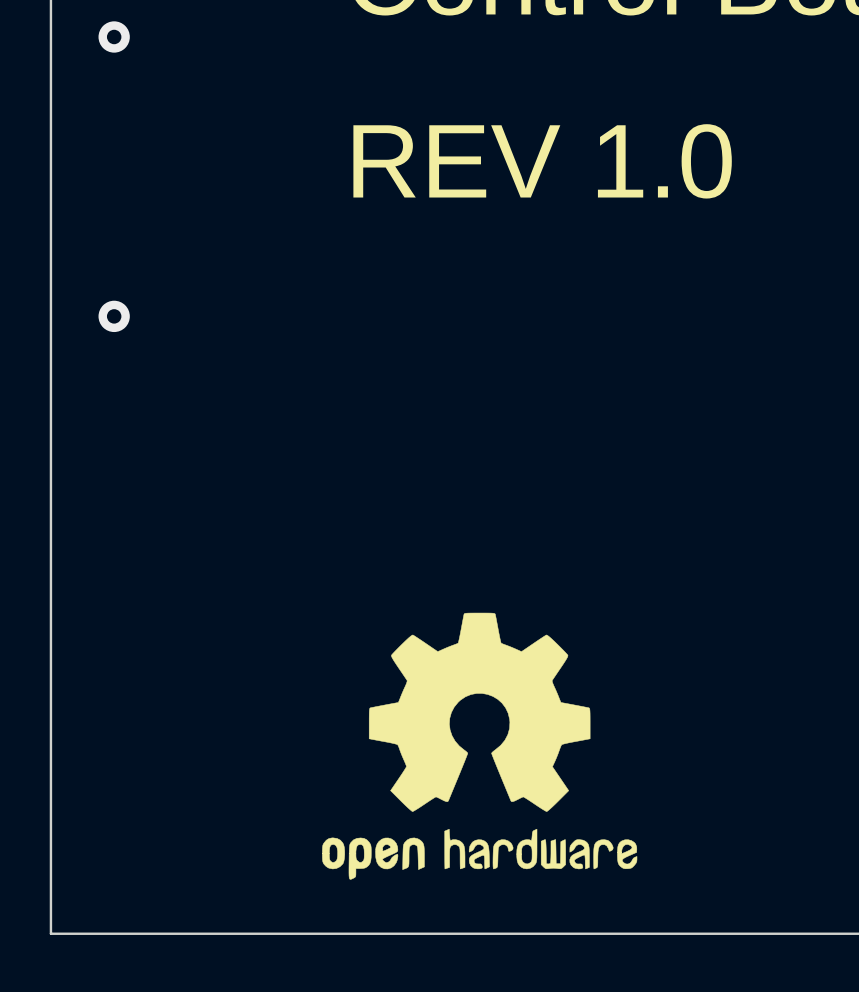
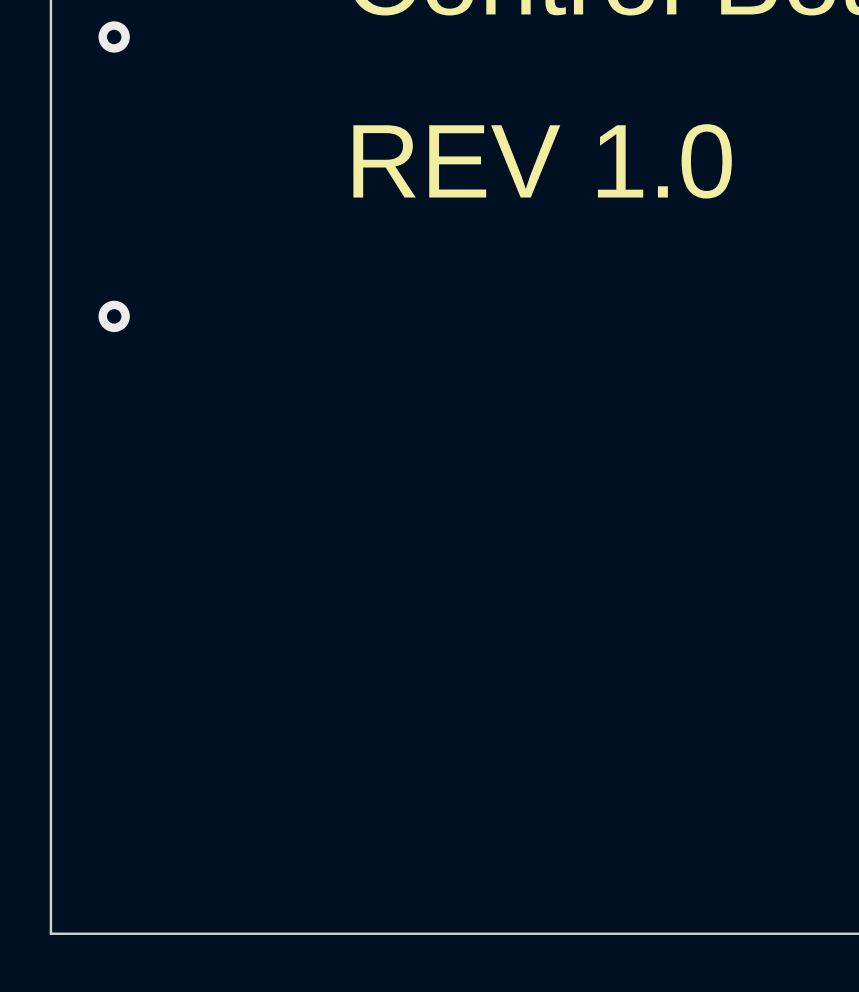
drawing: [322, 612, 638, 880] -> none

